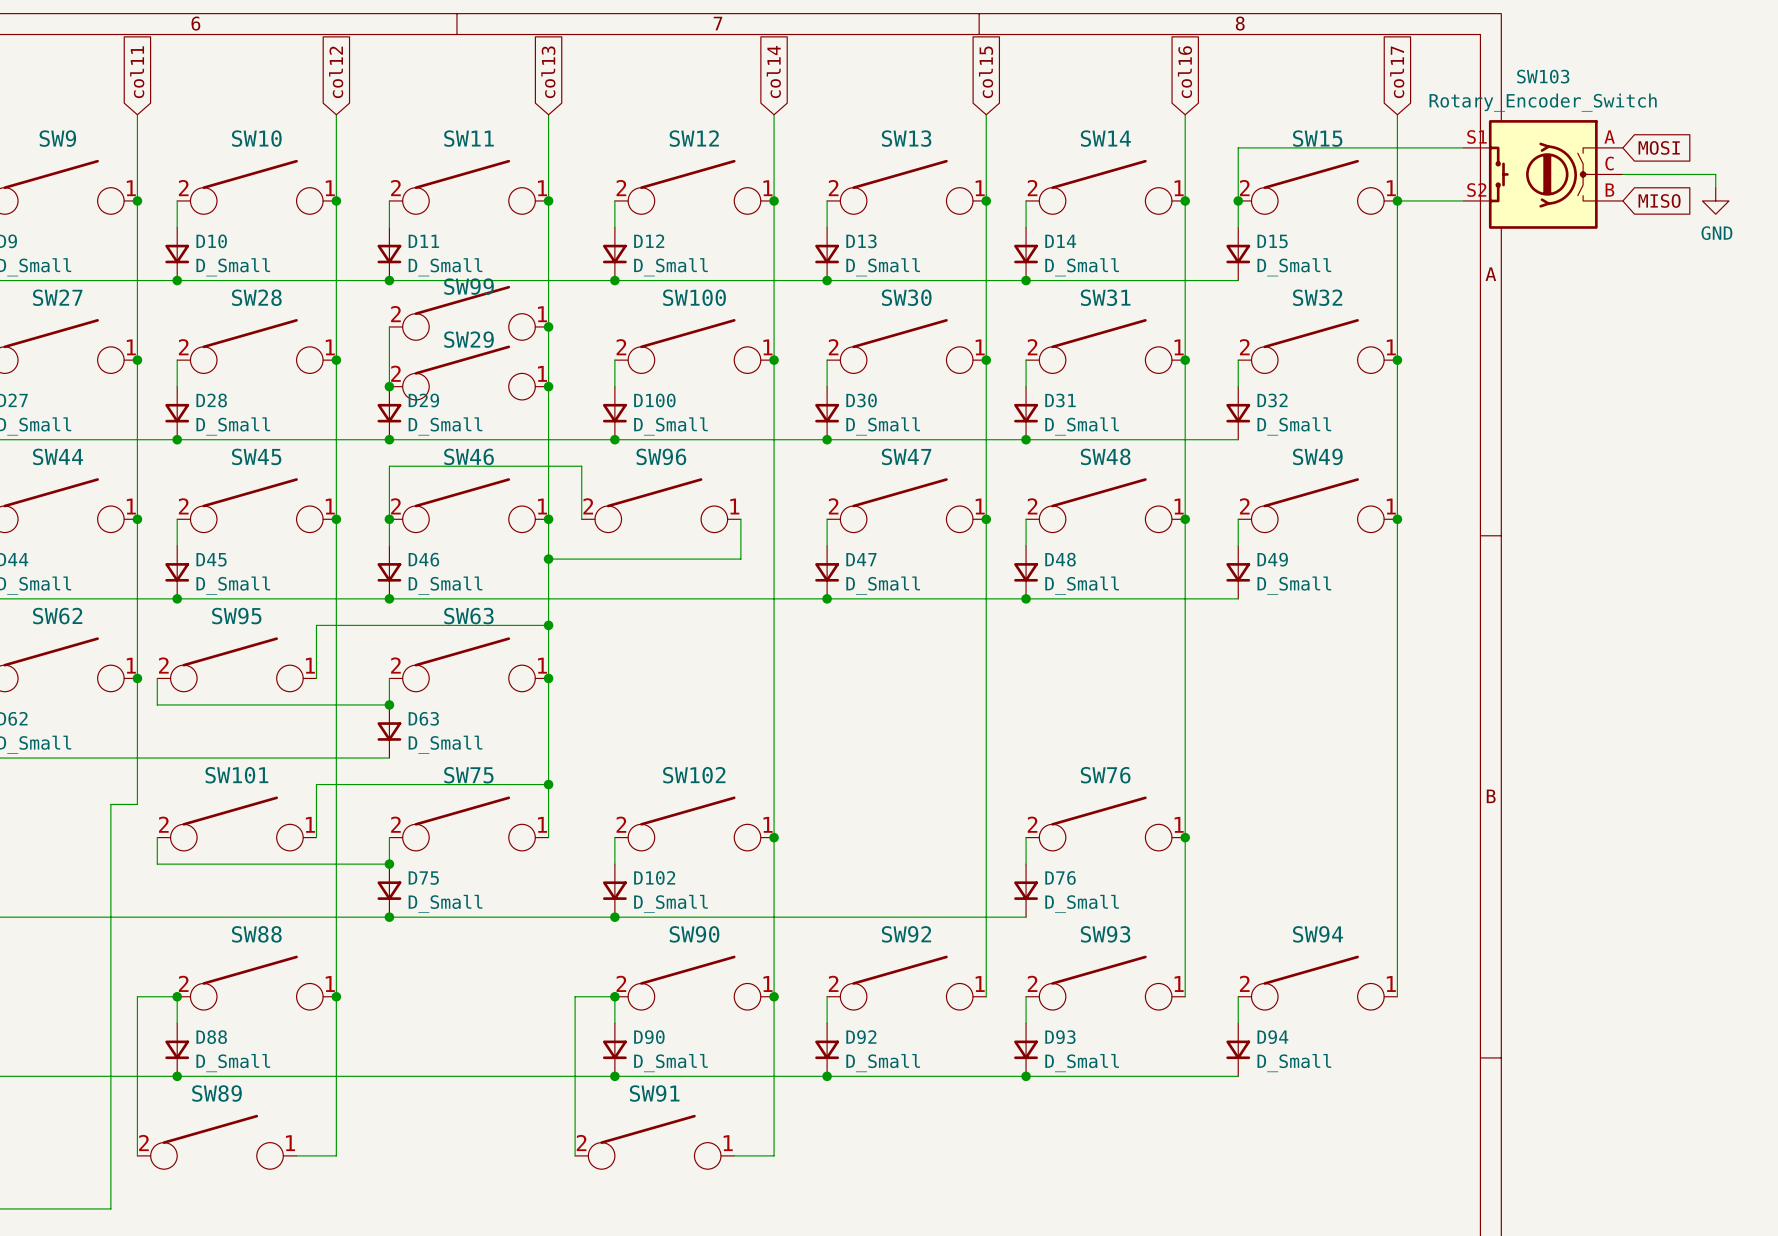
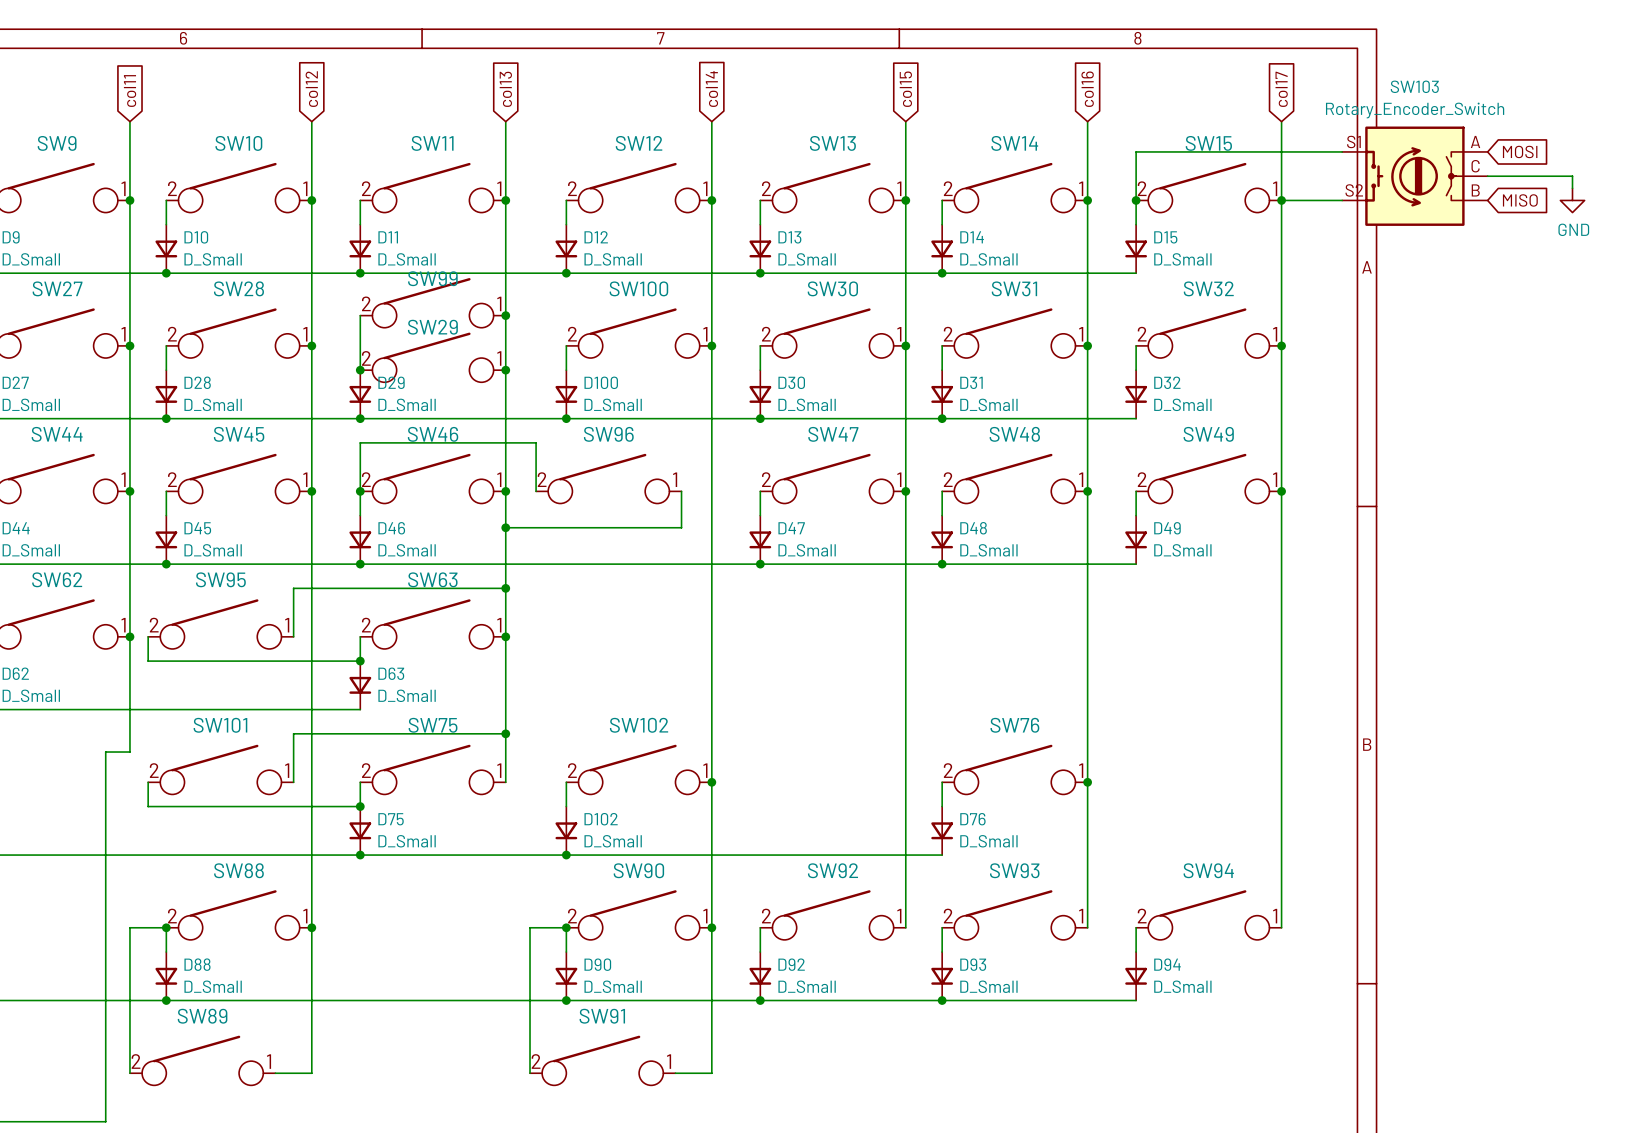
SW103 symbol: [1463, 120, 1623, 229] -> [1342, 126, 1488, 226]

